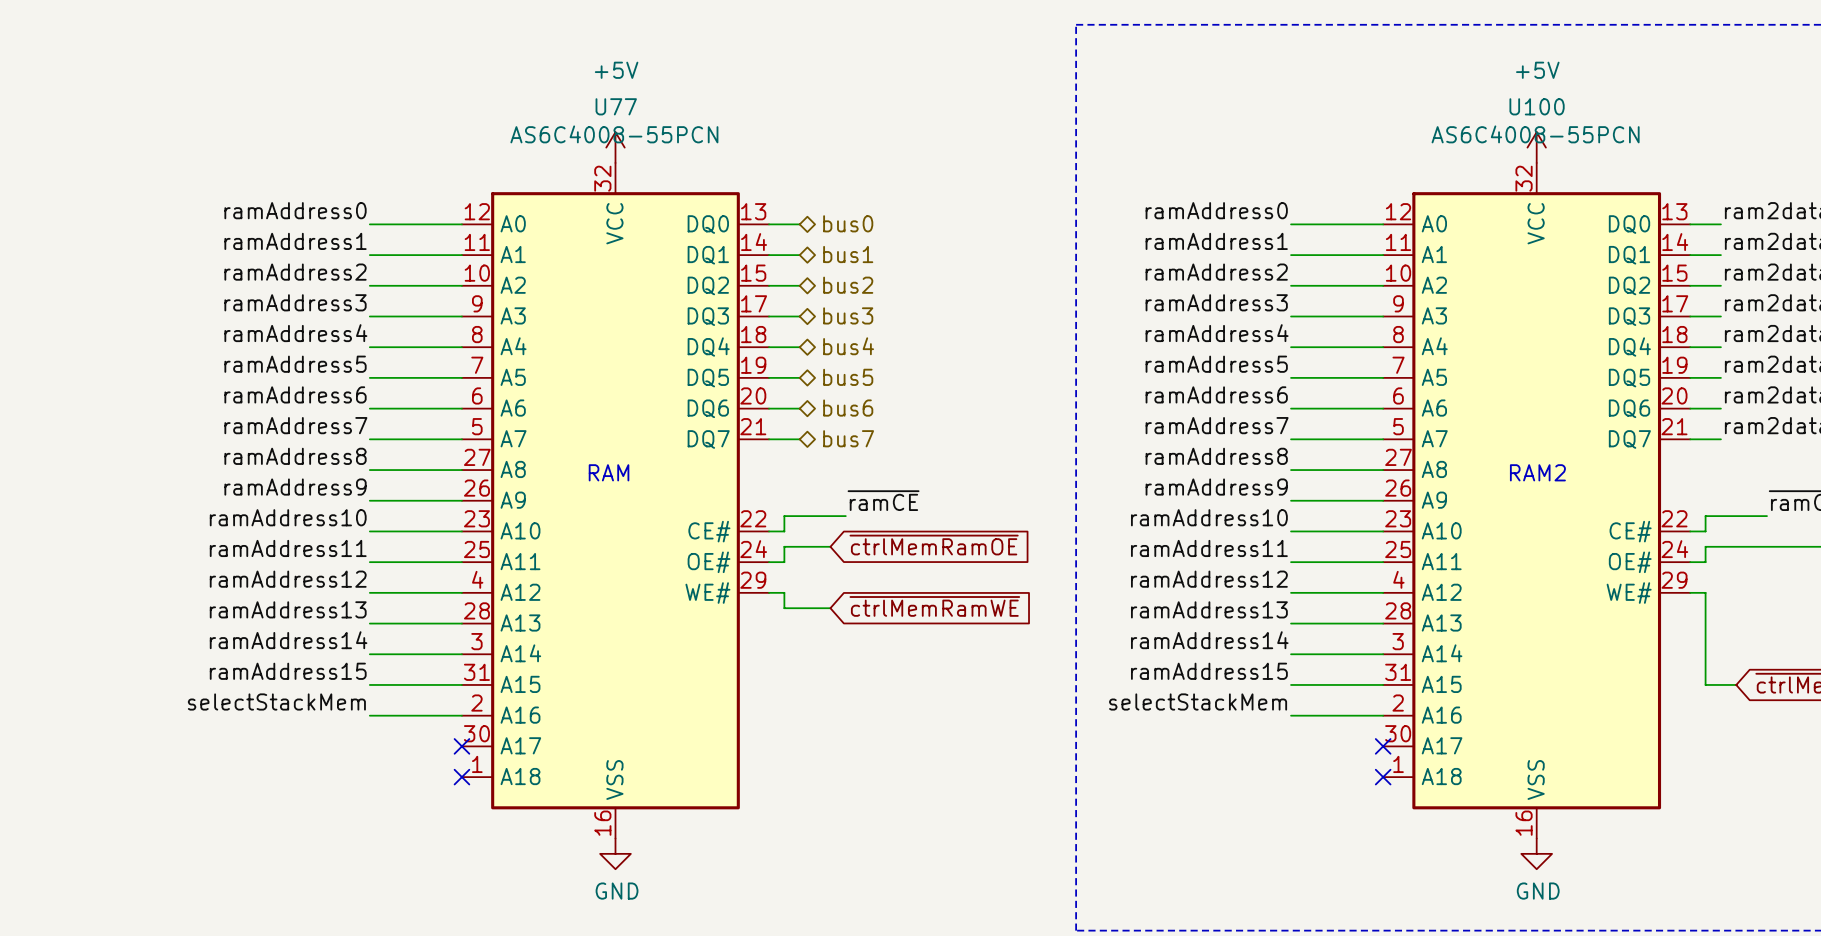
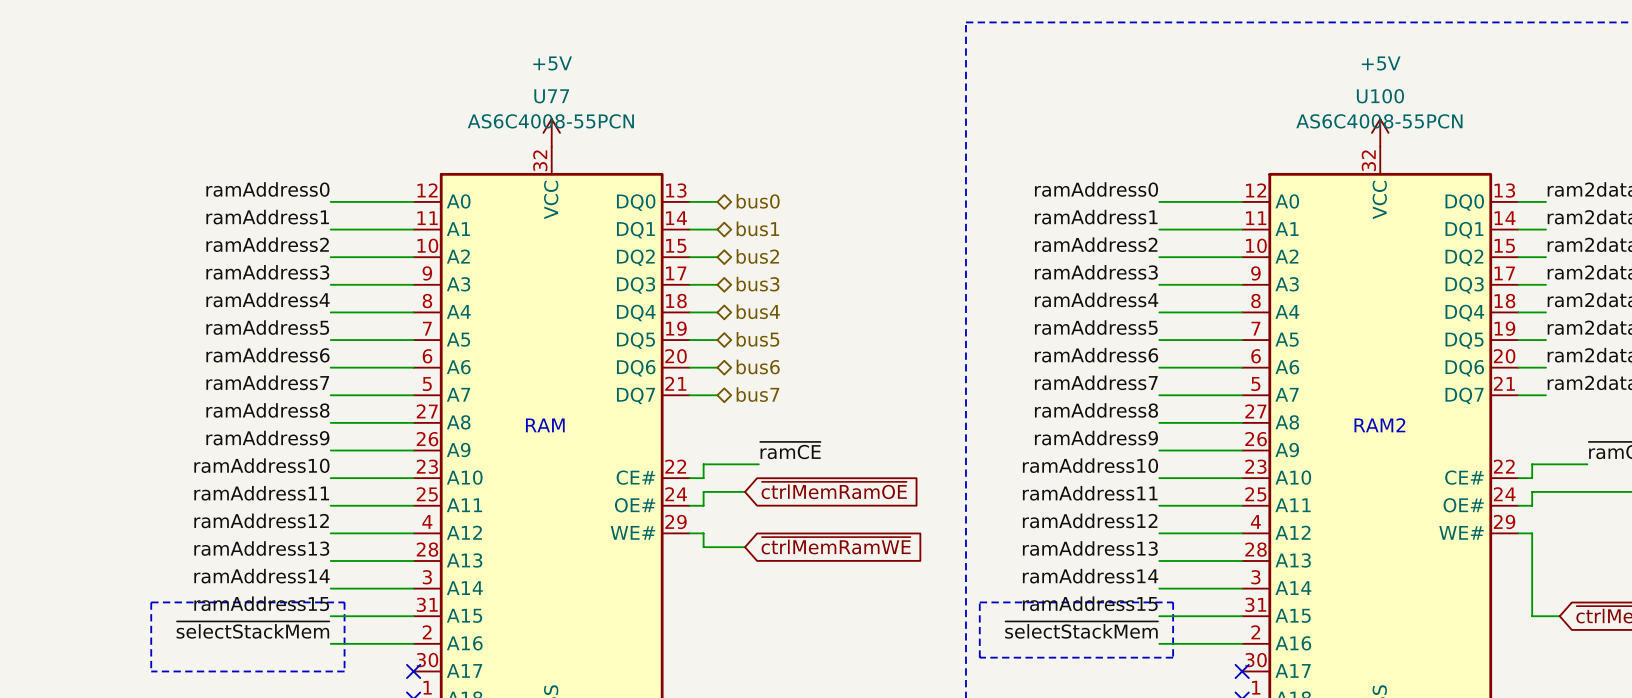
line: none -> (151, 602) (344, 602) (344, 671) (151, 671) (151, 602)
line: none -> (979, 602) (979, 657) (1173, 657) (1173, 602) (979, 602)
label: selectStackMem (276, 701) -> ~{selectStackMem} (252, 630)
label: selectStackMem (1198, 701) -> ~{selectStackMem} (1081, 630)

